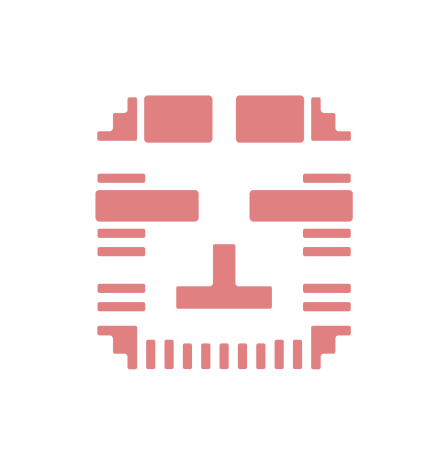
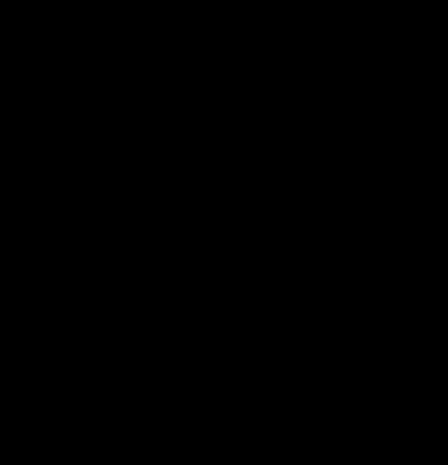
part: (224, 232) -> none

